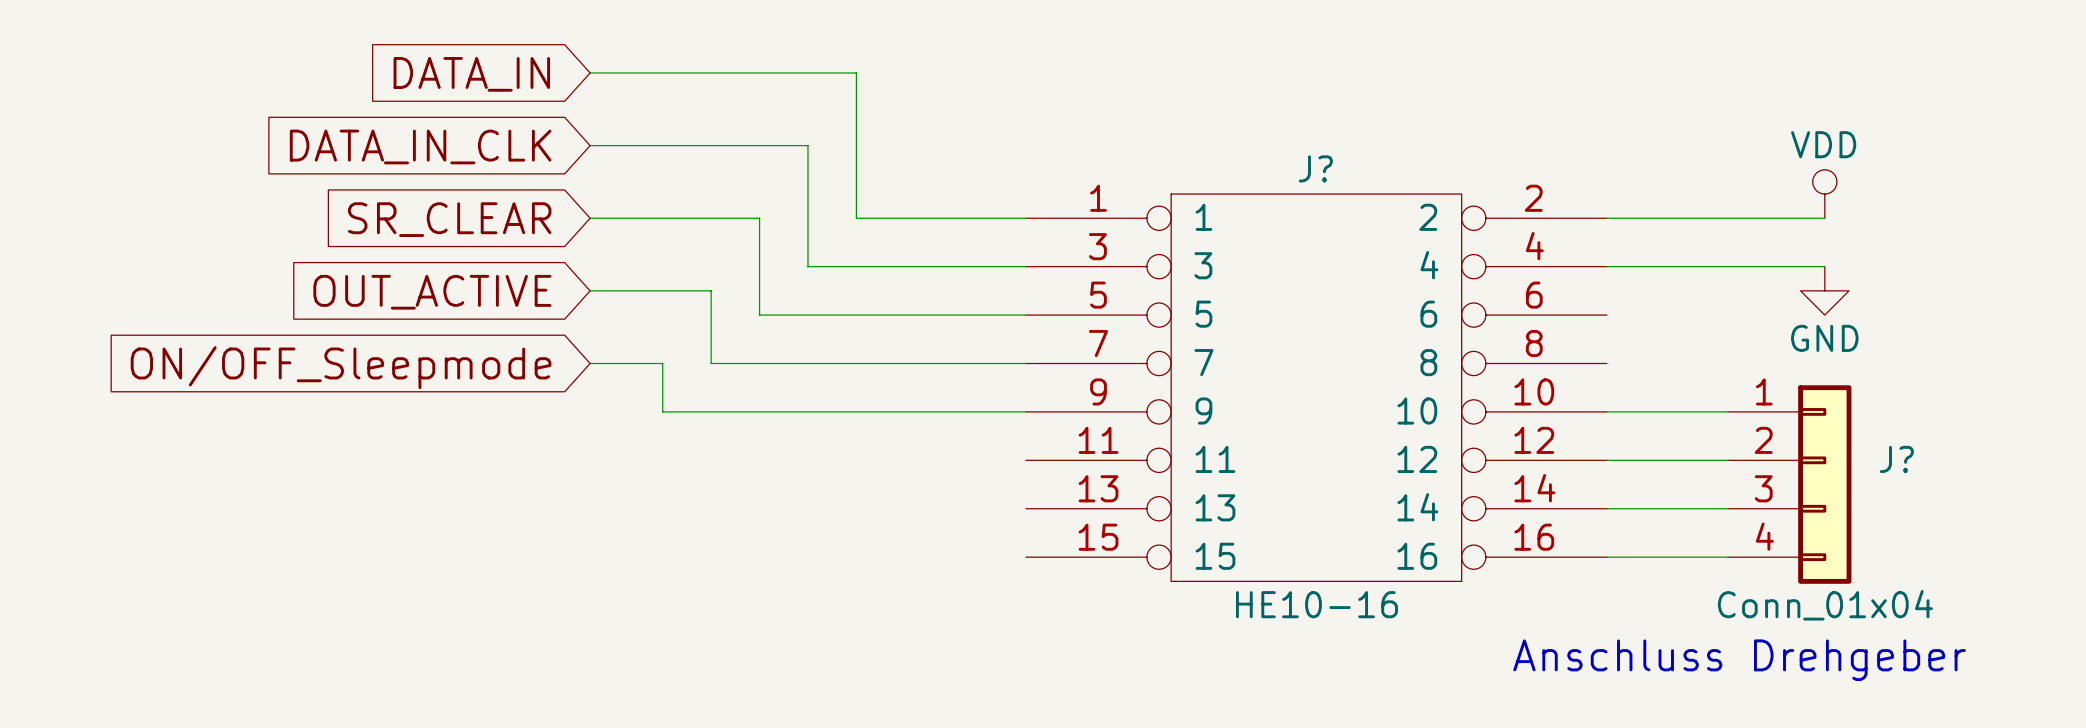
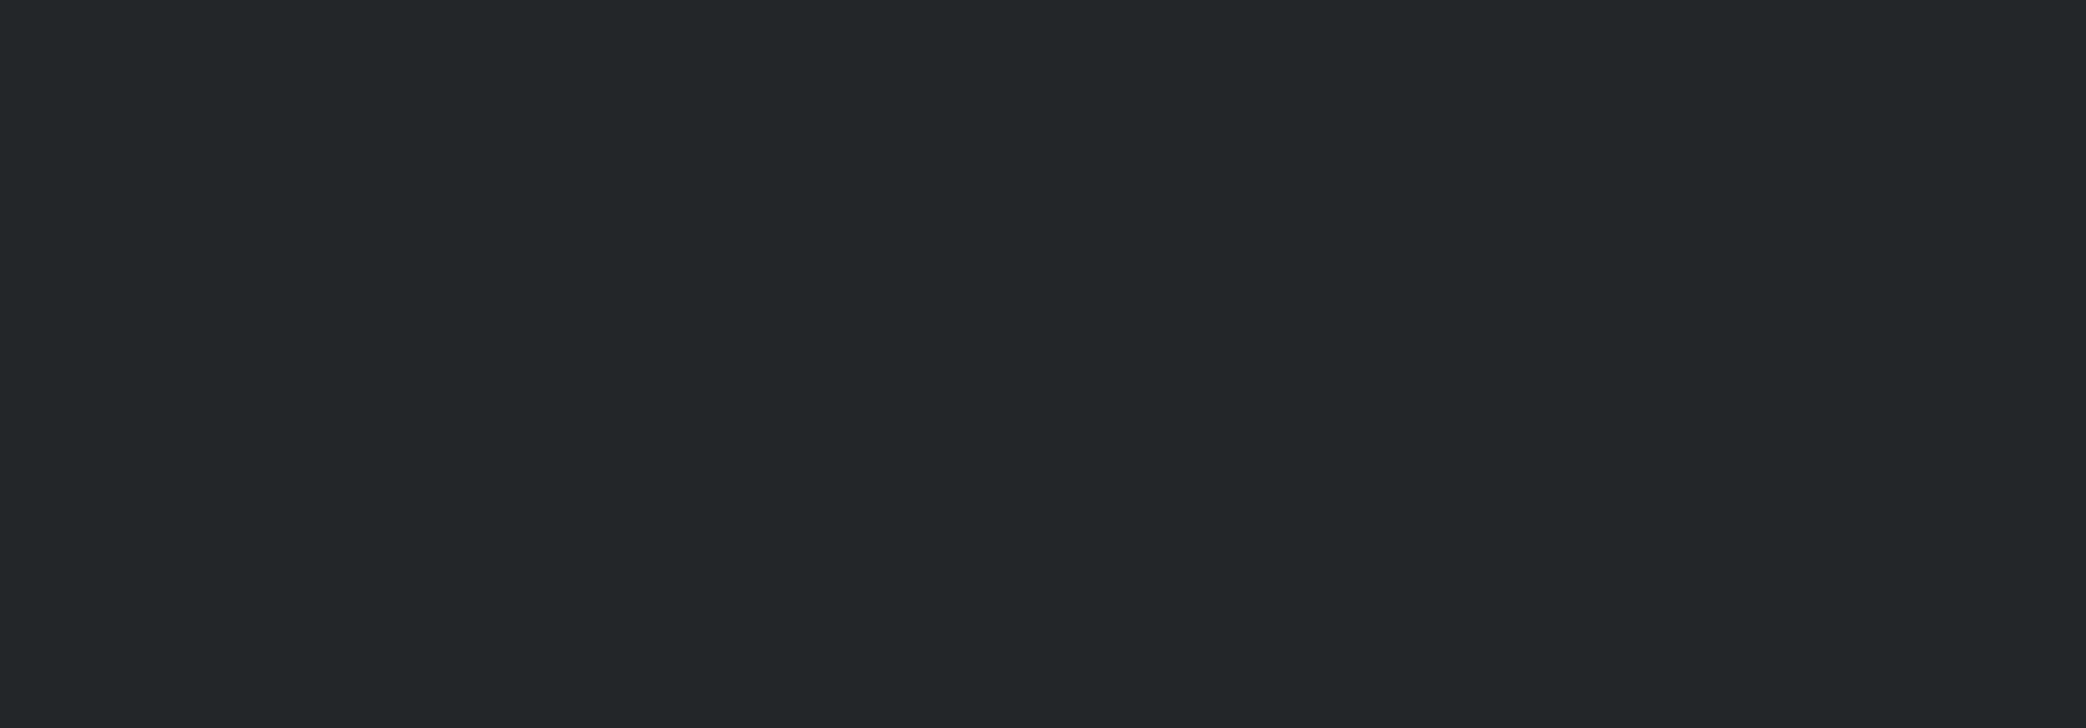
wire: (590, 72) (856, 72) (856, 218) (1025, 218) -> none
global label: DATA_IN (471, 74) -> none
wire: (590, 145) (807, 145) (807, 266) (1025, 266) -> none
global label: DATA_IN_CLK (420, 146) -> none
power symbol: VDD (1824, 194) -> none
wire: (590, 218) (759, 218) (759, 315) (1025, 315) -> none
wire: (1606, 218) (1824, 218) -> none
global label: SR_CLEAR (449, 219) -> none
wire: (1606, 266) (1824, 266) -> none
wire: (590, 290) (711, 290) (711, 363) (1025, 363) -> none
power symbol: GND (1824, 290) -> none
global label: OUT_ACTIVE (432, 292) -> none
wire: (590, 363) (662, 363) (662, 411) (1025, 411) -> none
global label: ON/OFF_Sleepmode (341, 367) -> none
J?: HE10-16 (1316, 387) -> none
wire: (1606, 411) (1727, 411) -> none
wire: (1606, 460) (1727, 460) -> none
J?: Conn_01x04 (1789, 484) -> none
wire: (1606, 508) (1727, 508) -> none
wire: (1606, 557) (1727, 557) -> none
text: Anschluss Drehgeber (1739, 660) -> none

